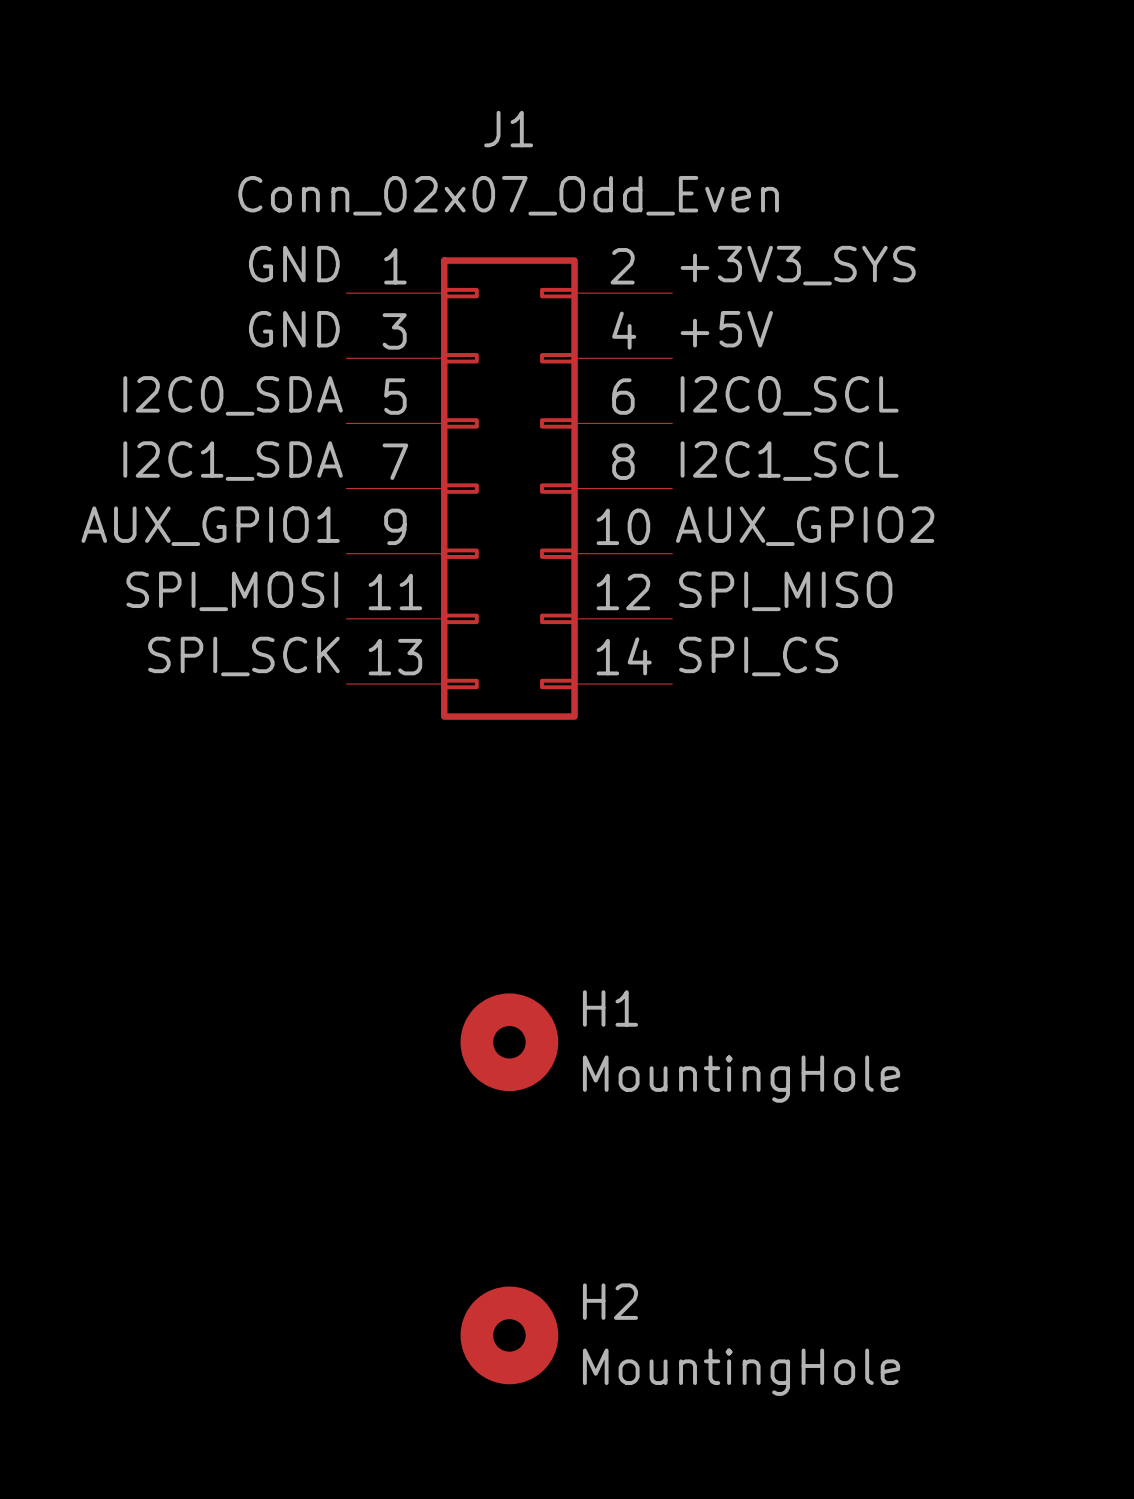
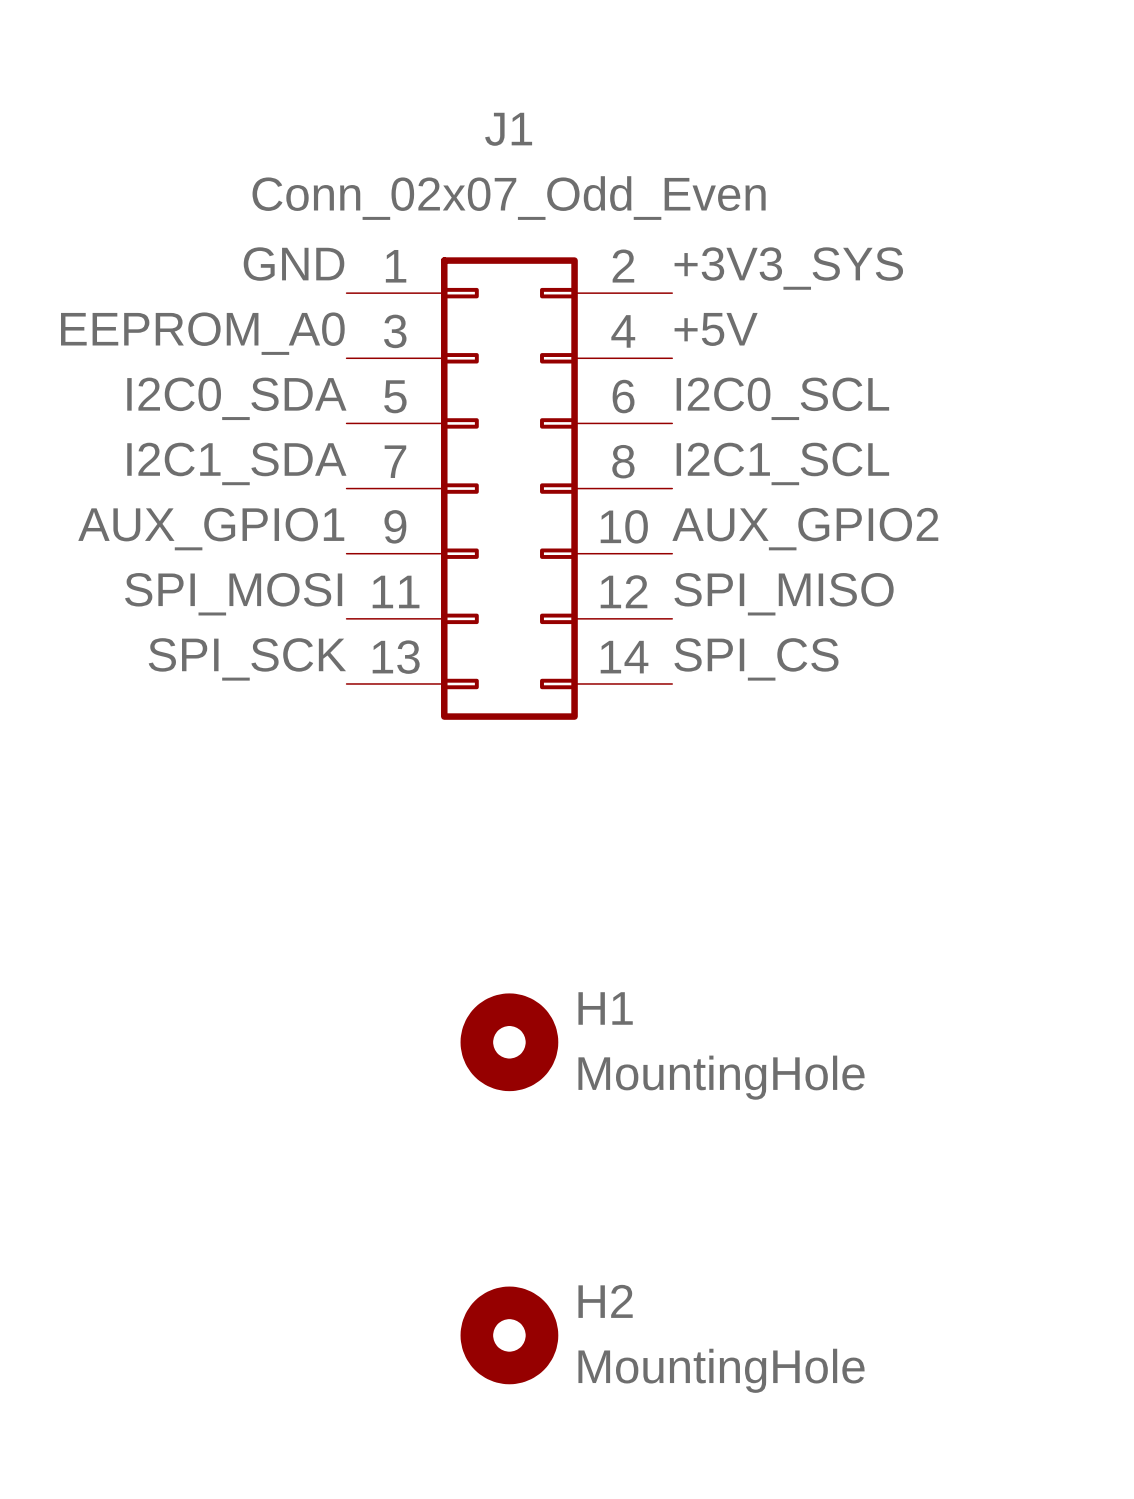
label: GND (294, 329) -> EEPROM_A0 (202, 333)

